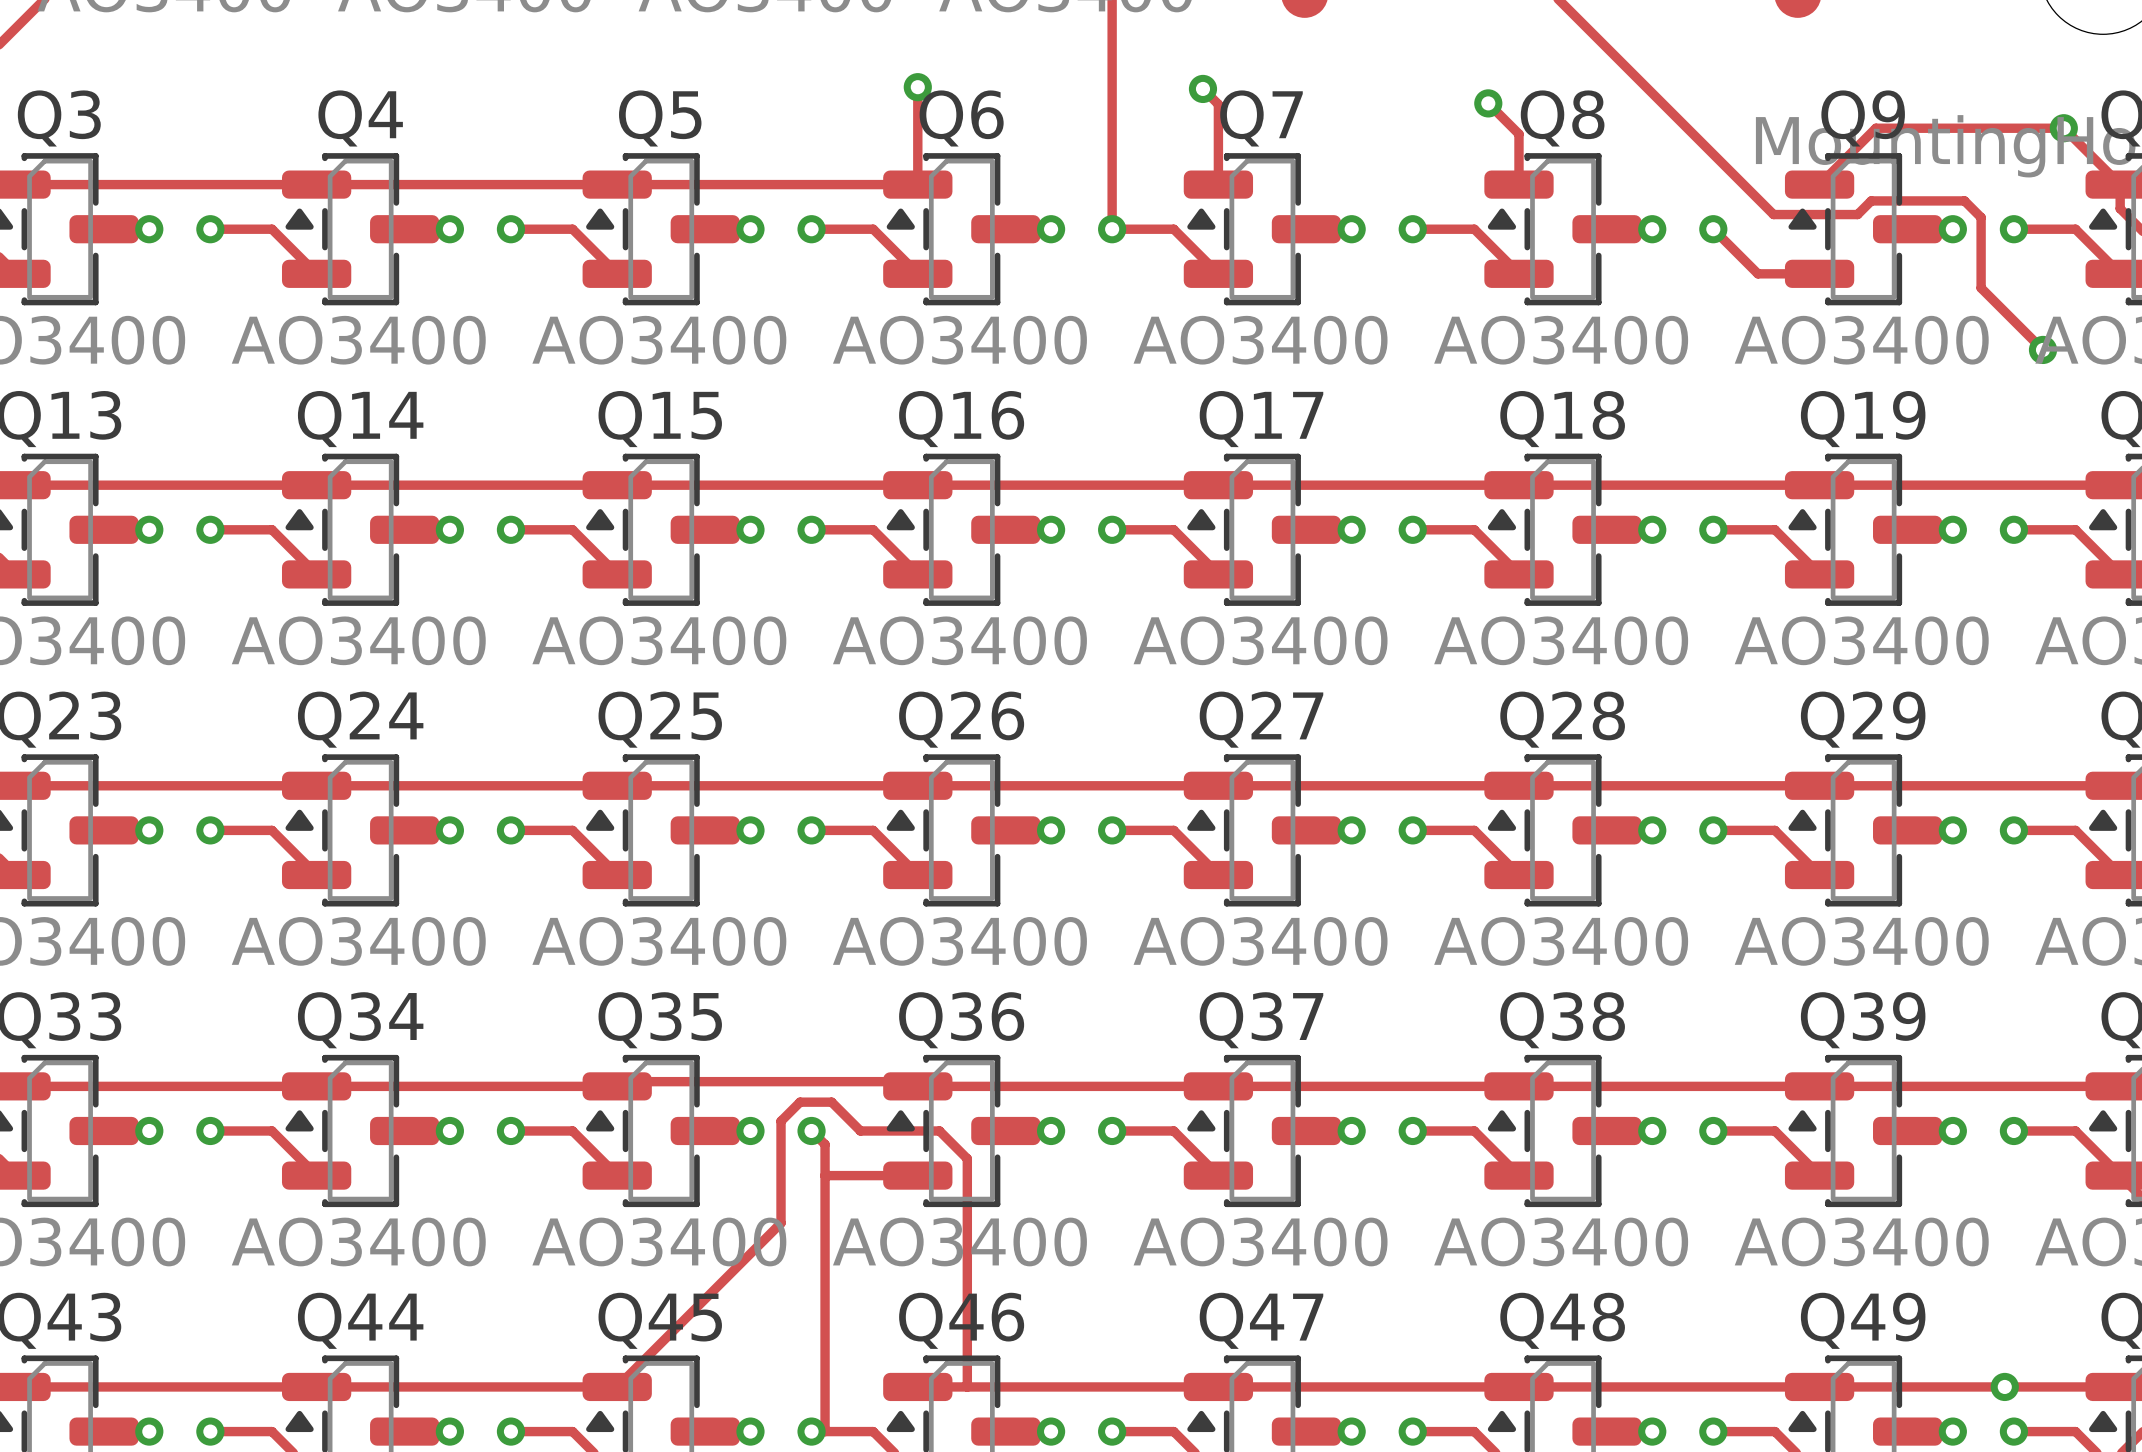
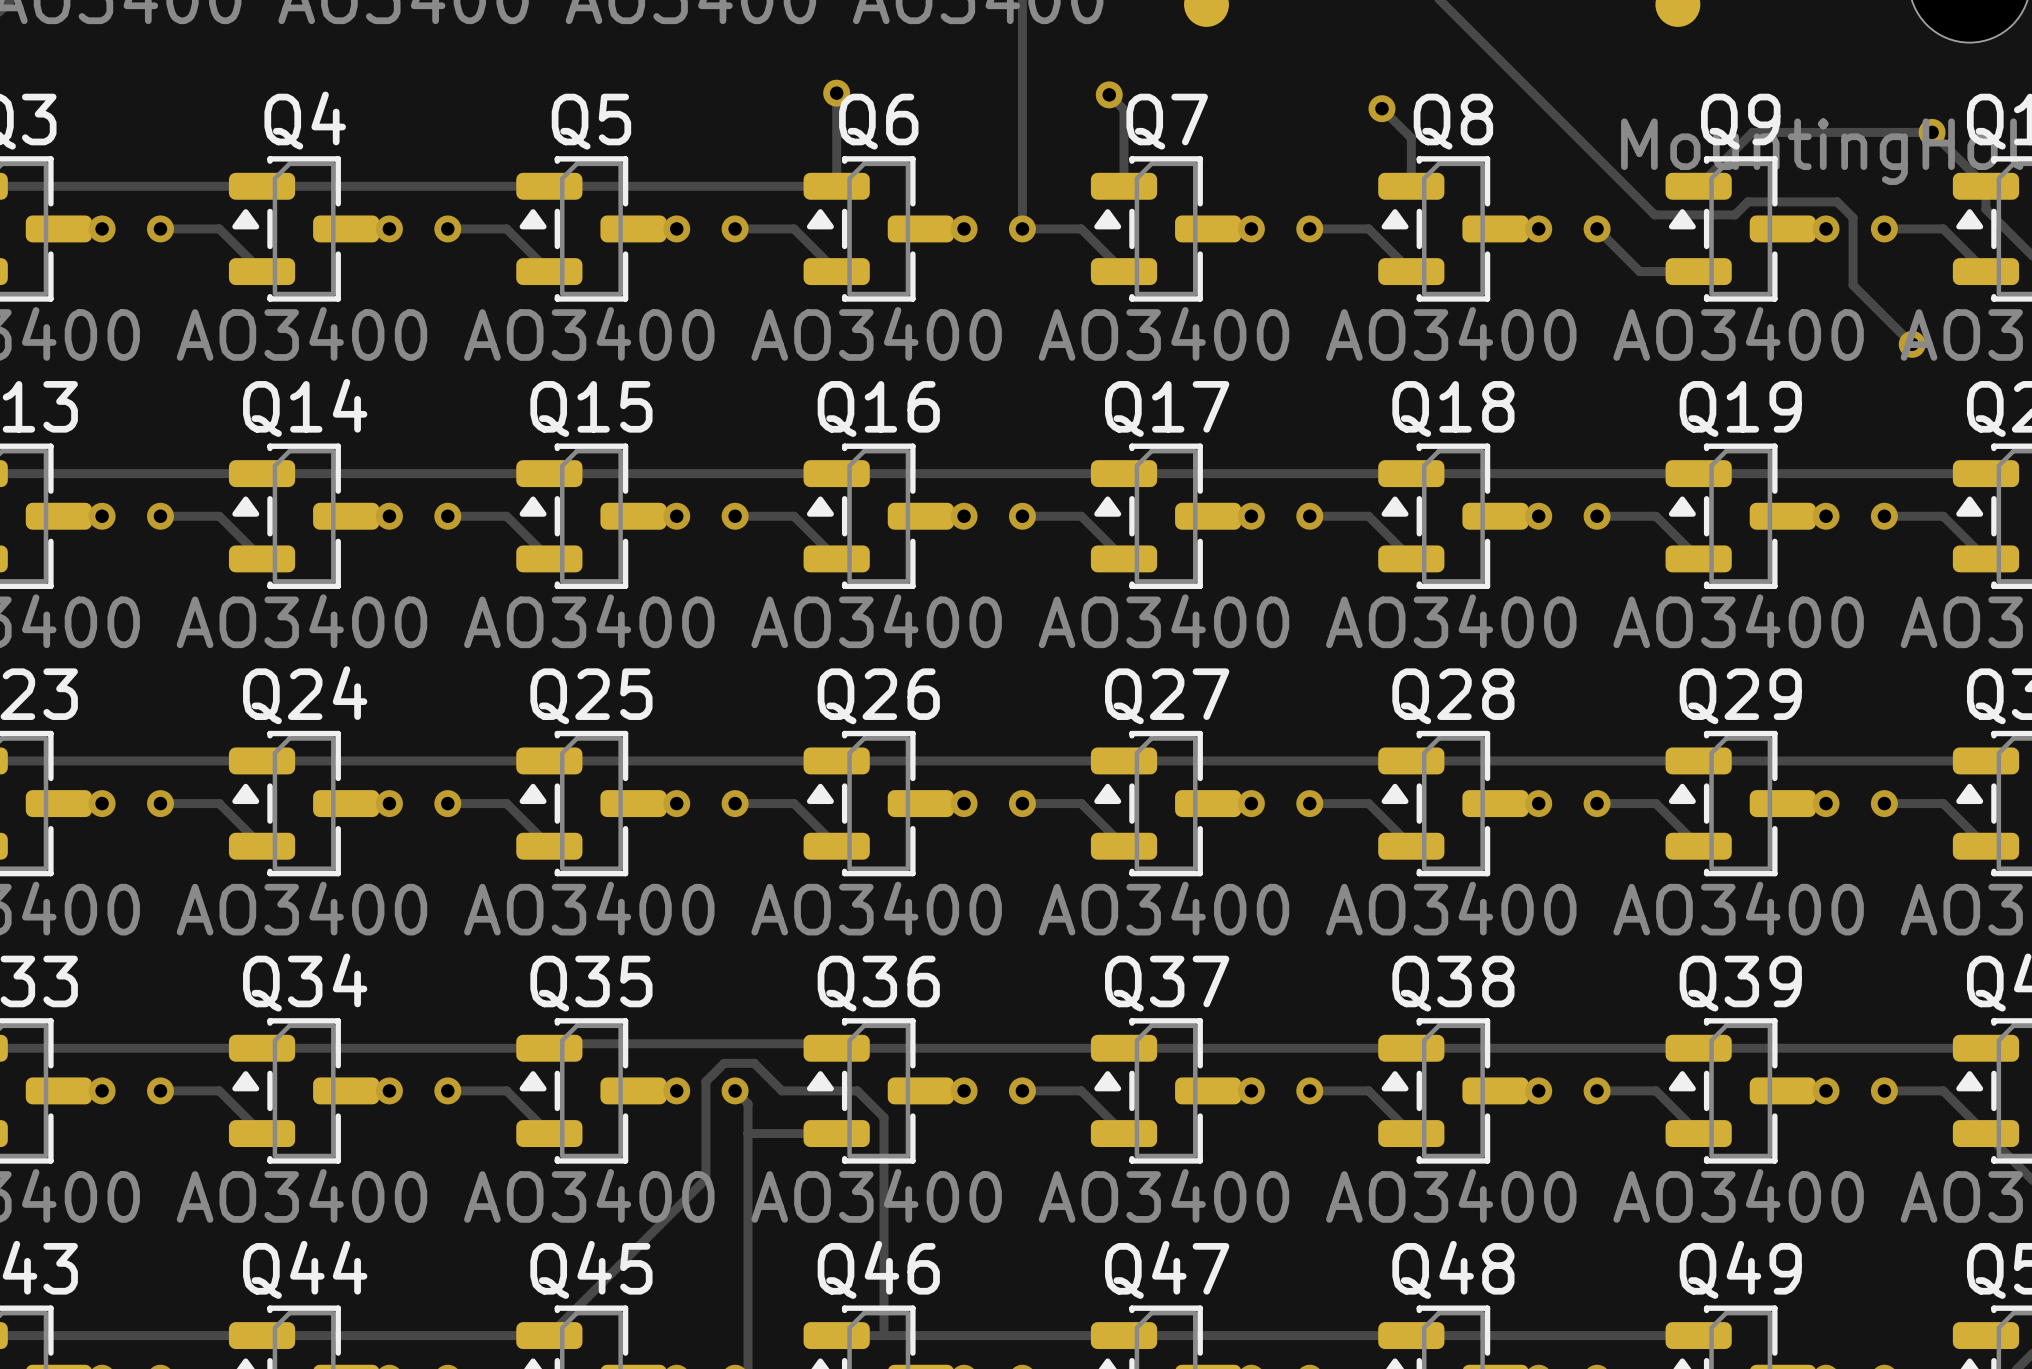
track: (1819, 1386) (2120, 1386) -> none
via: (2004, 1386) -> none

